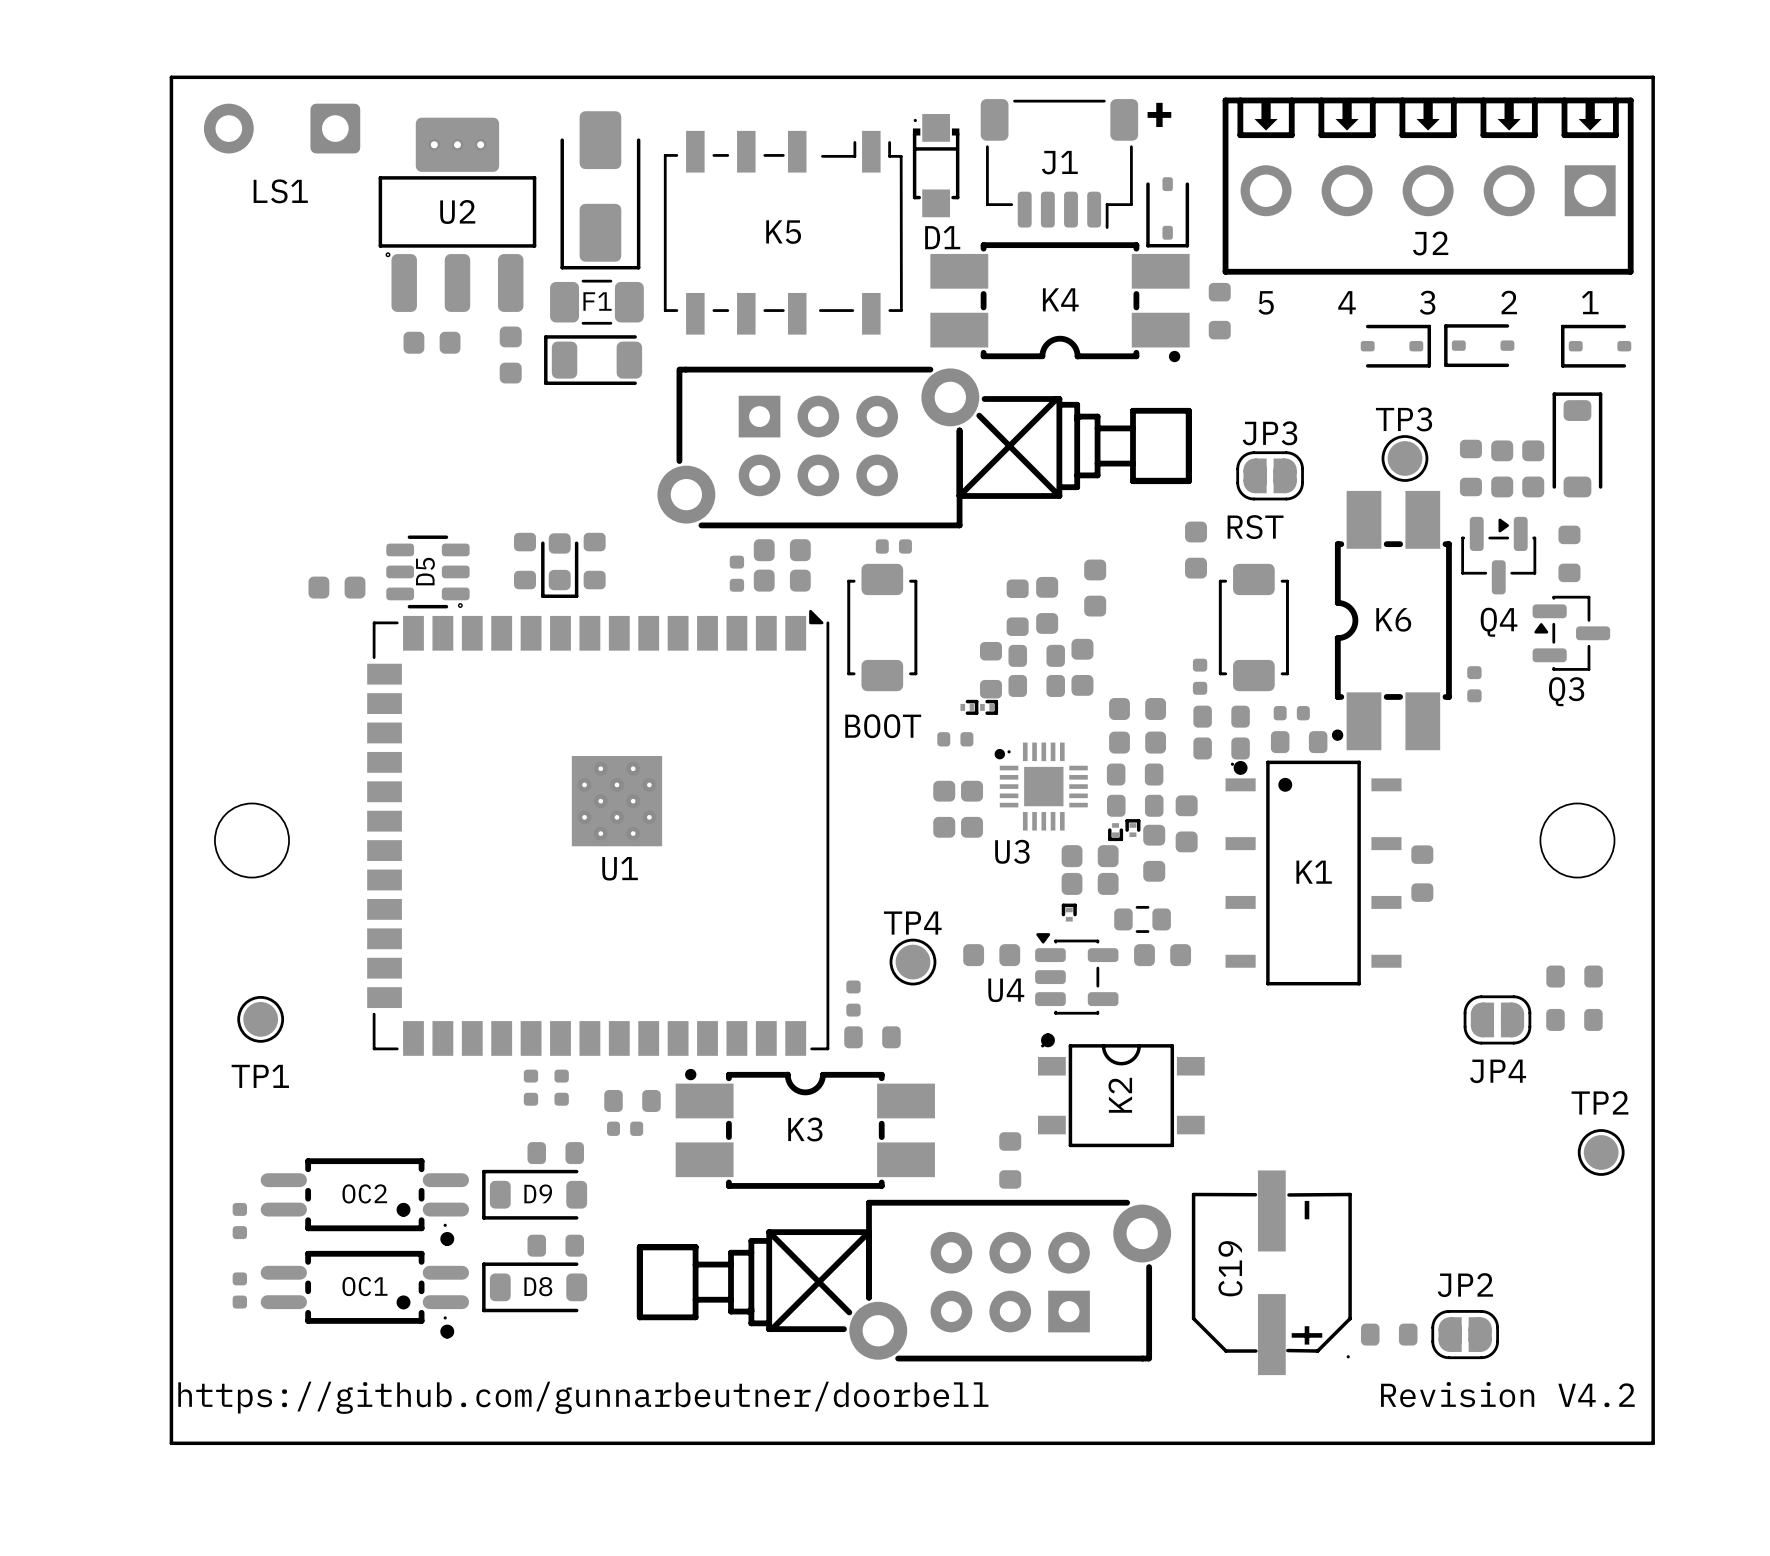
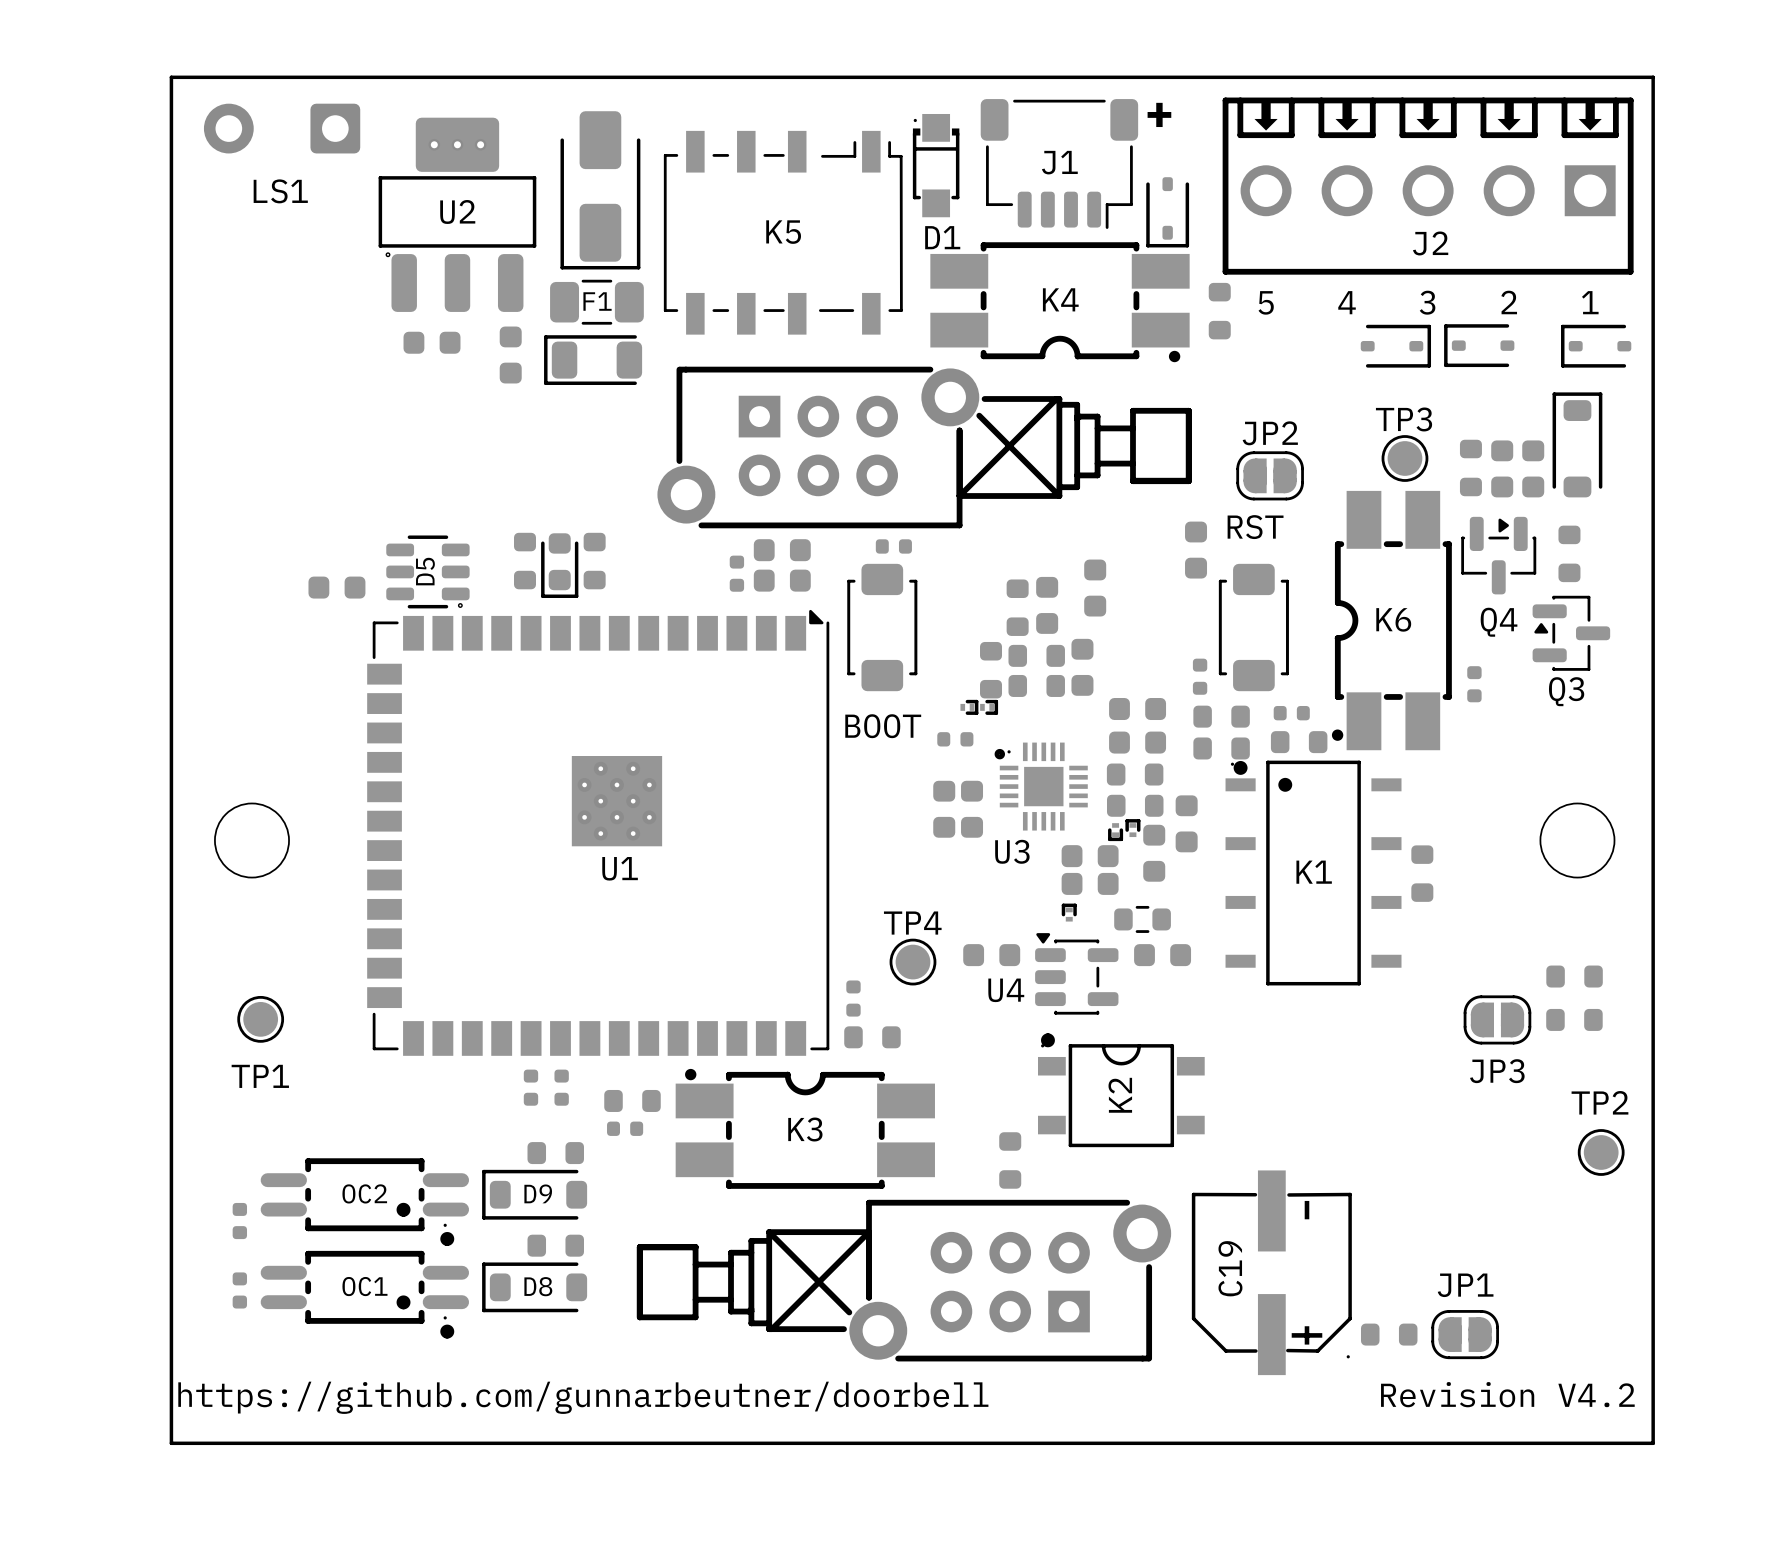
JP3 name: JP3 (1269, 433) -> JP2 (1270, 433)
JP4 name: JP4 (1498, 1071) -> JP3 (1497, 1071)
JP2 name: JP2 (1465, 1285) -> JP1 (1465, 1285)

